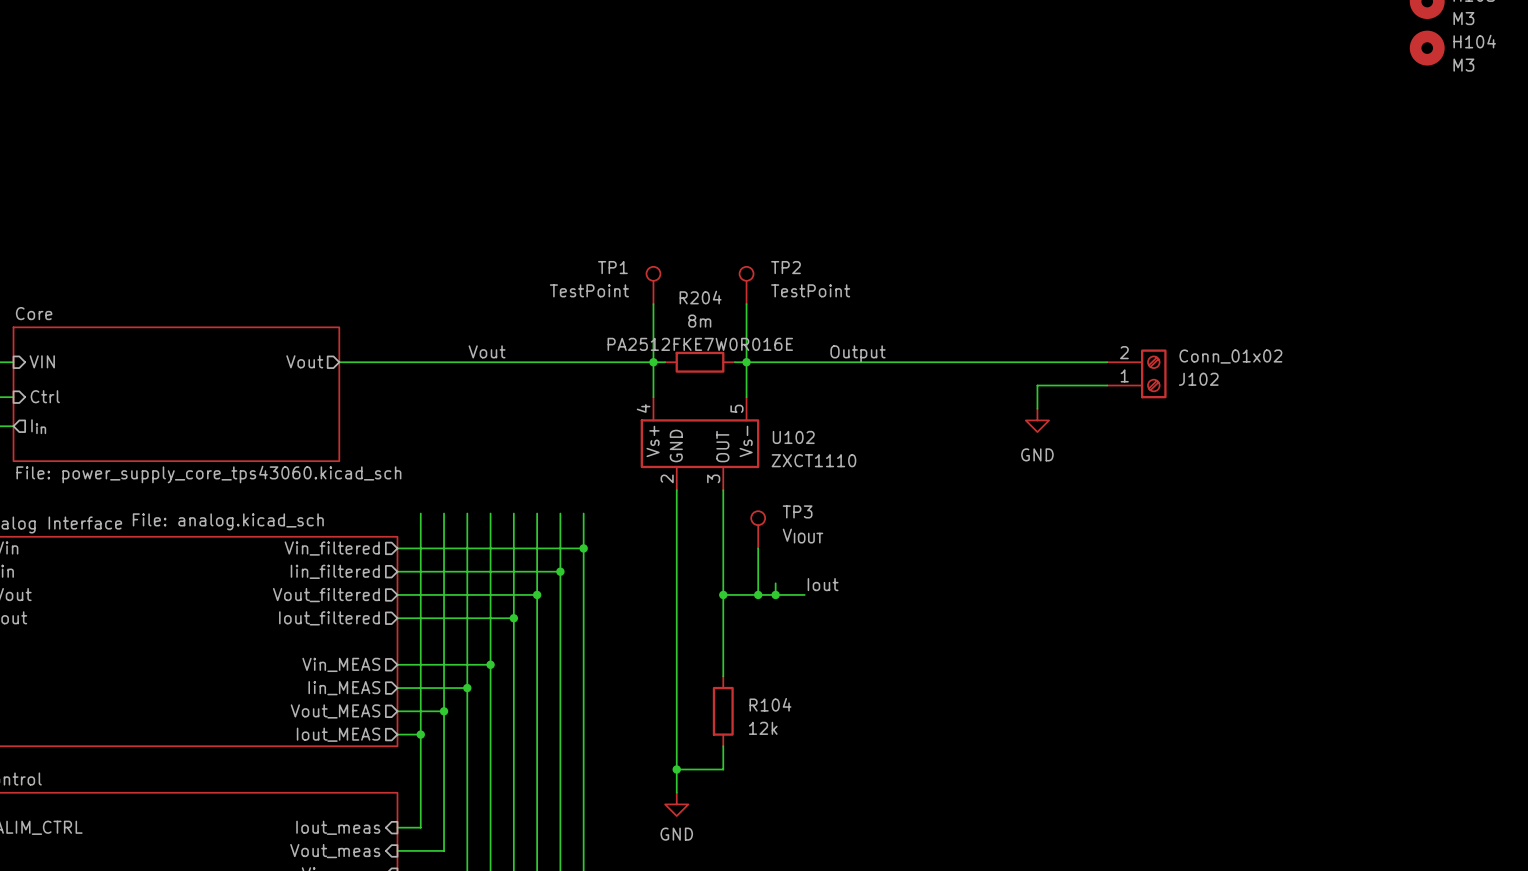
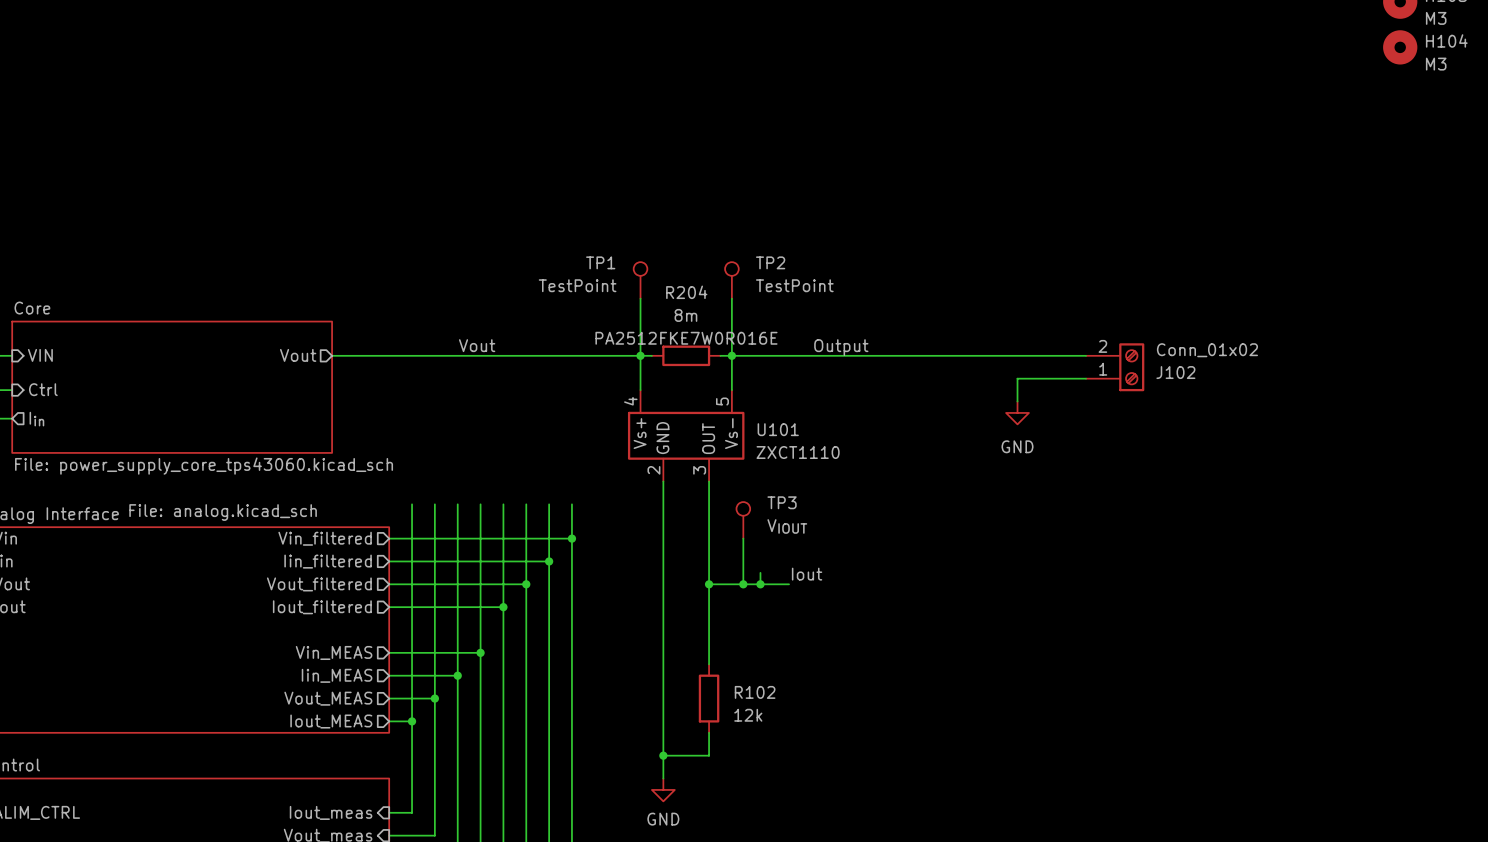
U102 name: U102 (793, 437) -> U101 (778, 429)
R104 name: R104 (770, 704) -> R102 (755, 692)

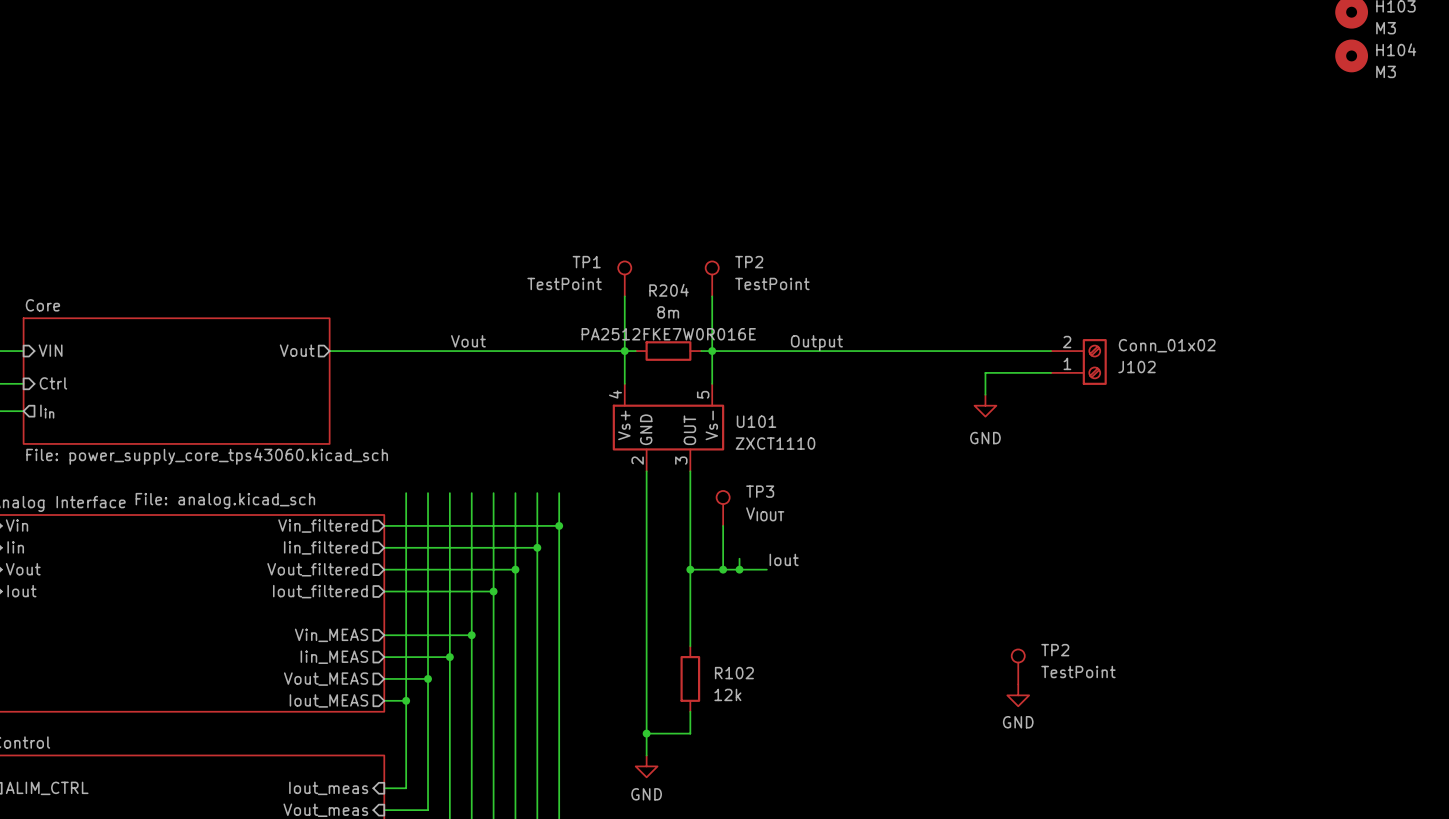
TP2: none -> TestPoint (1018, 666)
power symbol: none -> GND (1018, 695)

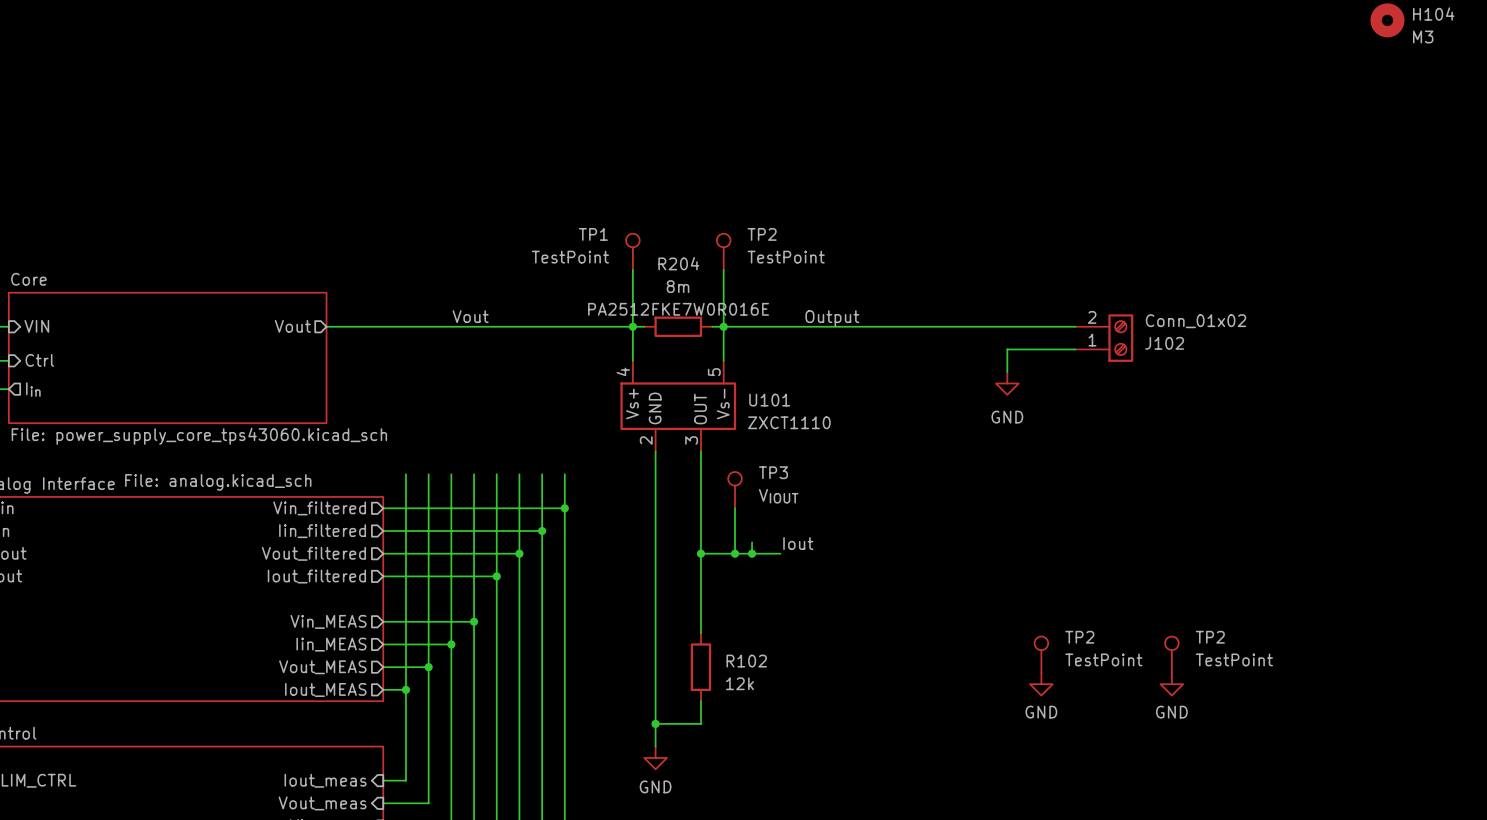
TP2: none -> TestPoint (1171, 654)
power symbol: none -> GND (1171, 684)

